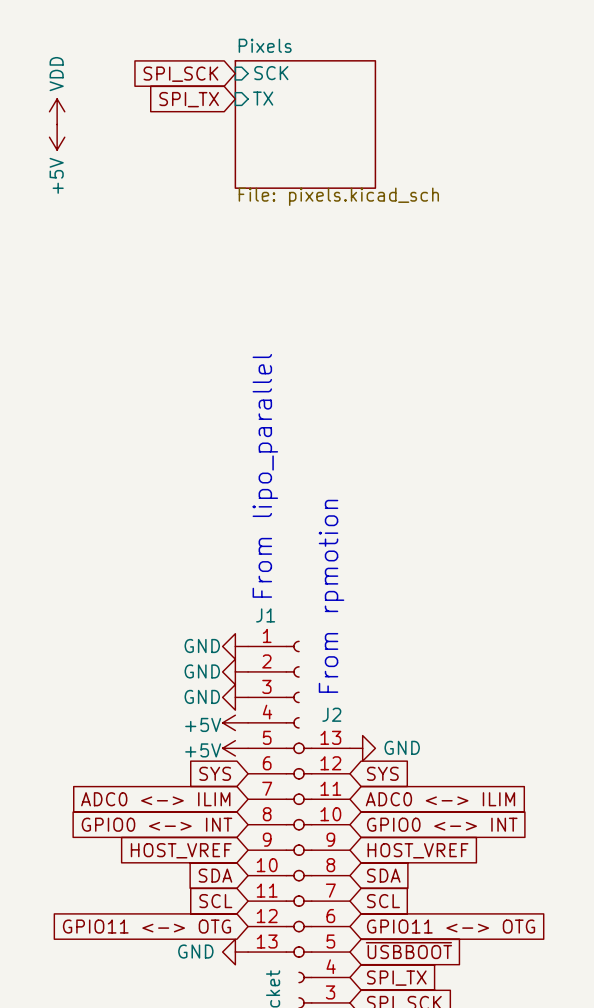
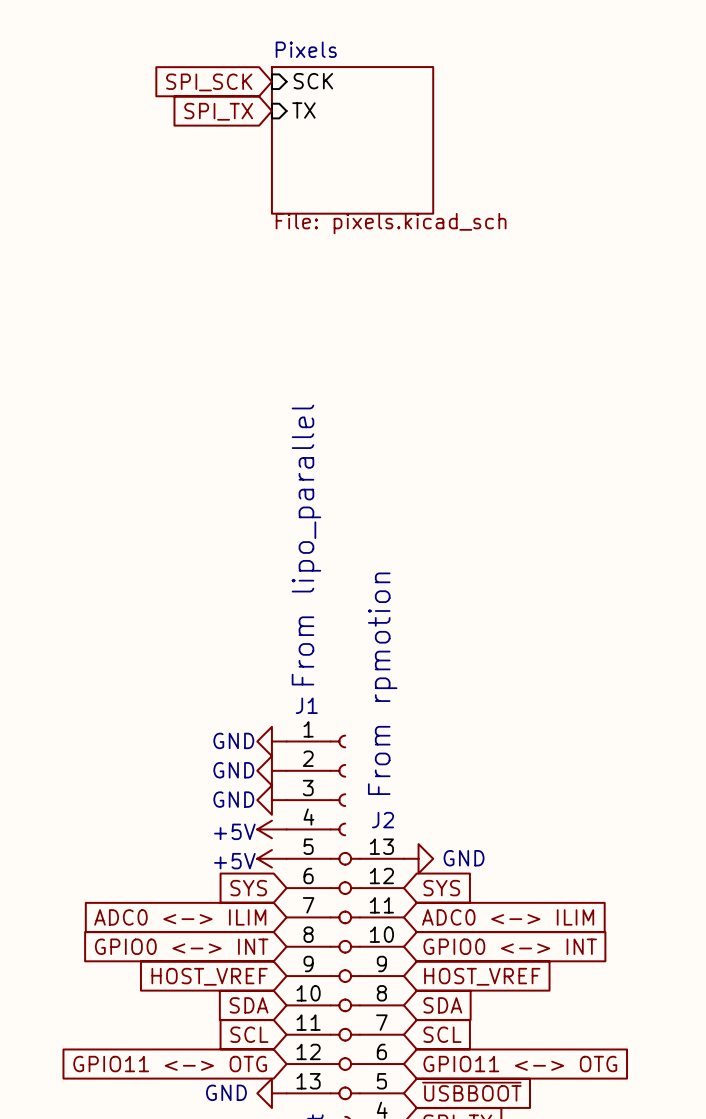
power symbol: VDD (57, 111) -> none
power symbol: +5V (57, 137) -> none

